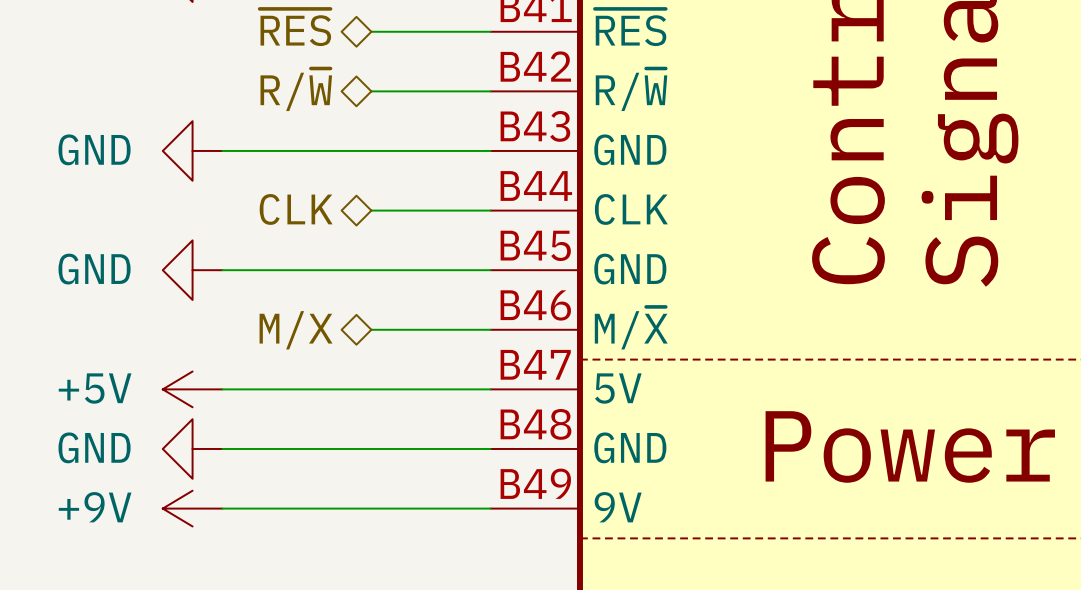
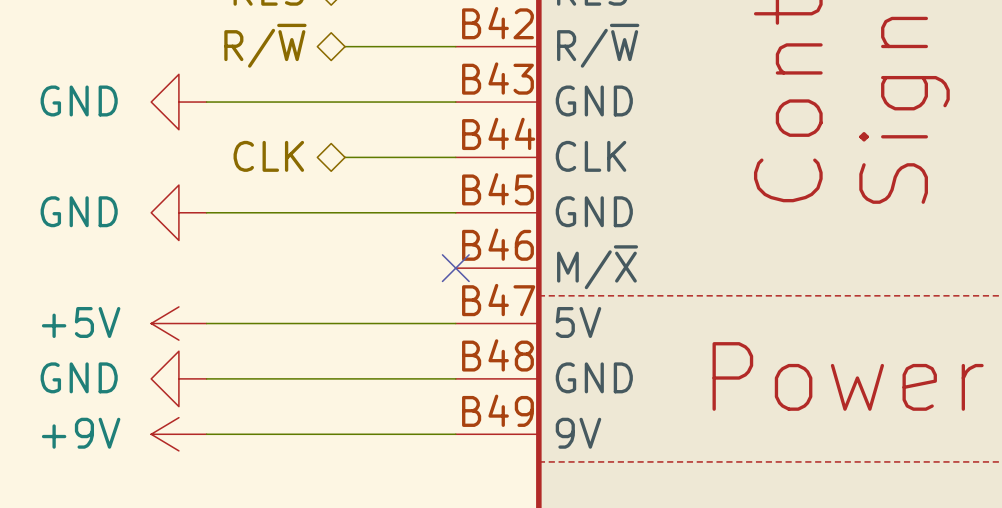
wire: (371, 329) (490, 329) -> none
no-connect mark: none -> (455, 268)
hierarchical label: M/X (296, 330) -> none

